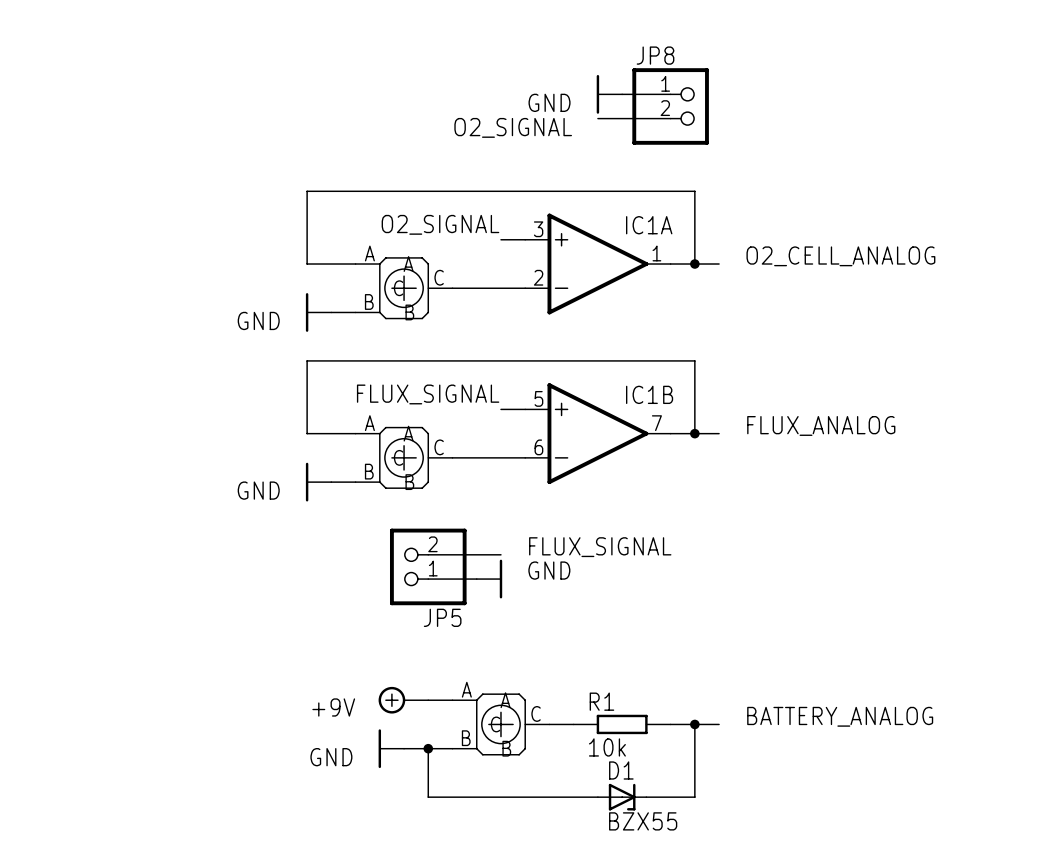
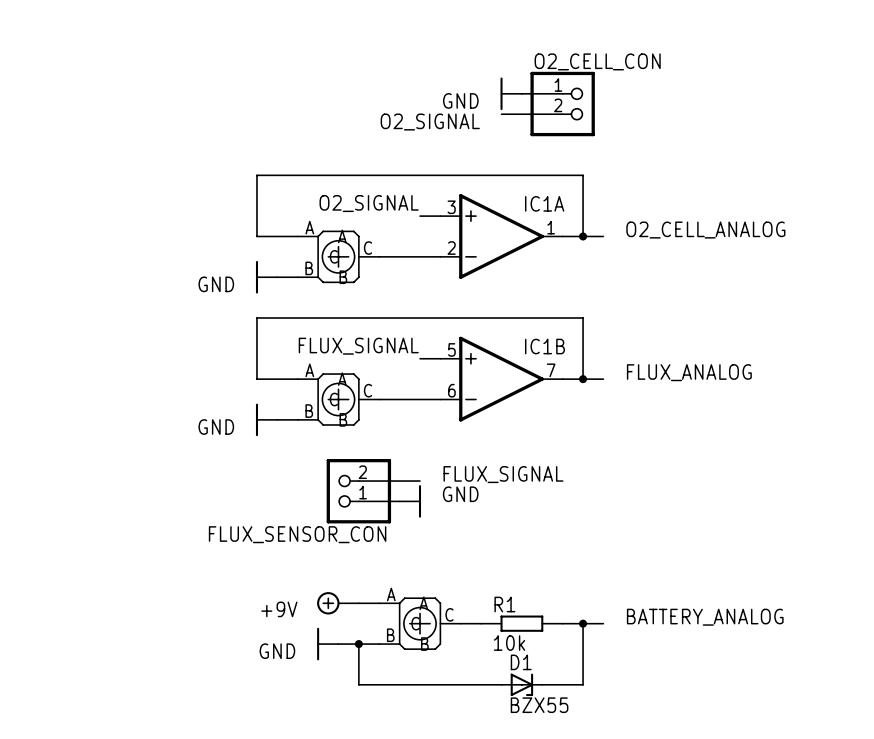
JP8 name: JP8 (655, 55) -> O2_CELL_CON (597, 61)
JP5 name: JP5 (442, 617) -> FLUX_SENSOR_CON (297, 534)

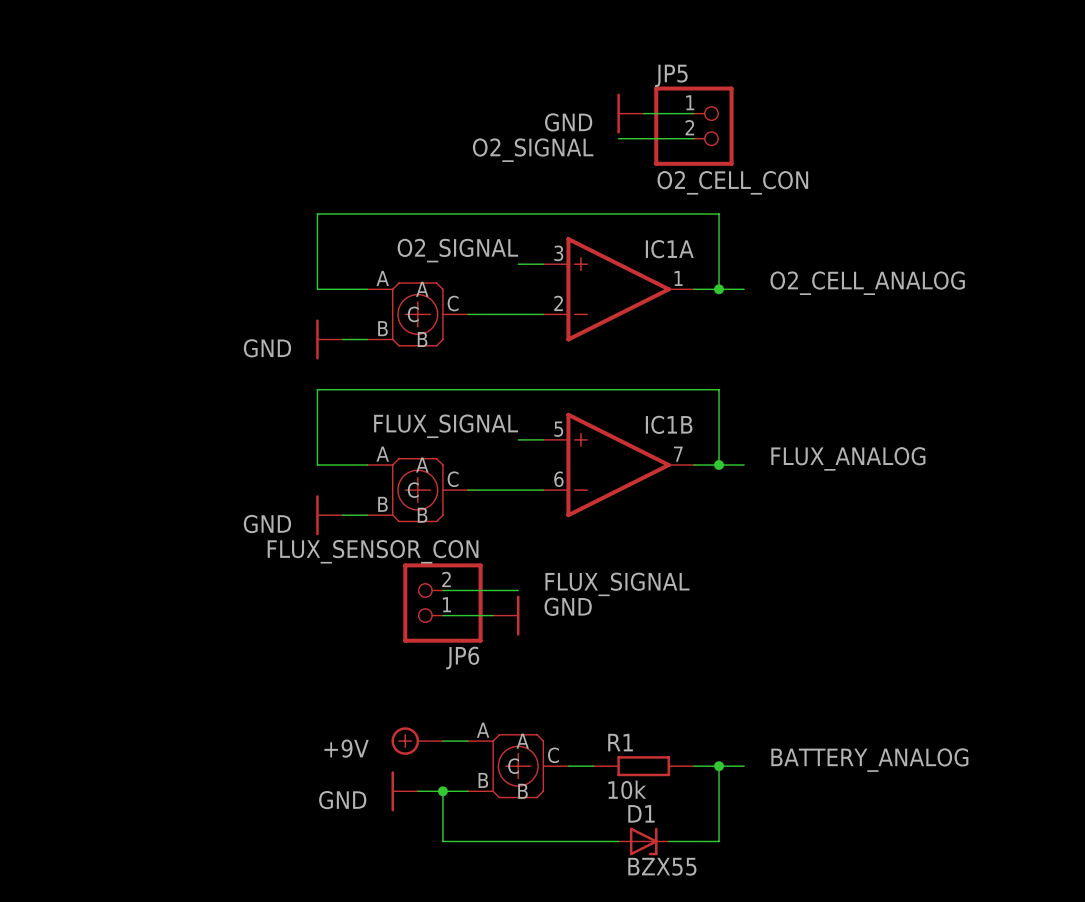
O2_CELL_CON name: O2_CELL_CON (597, 61) -> JP5 (671, 75)
O2_CELL_CON value: none -> O2_CELL_CON (732, 182)
FLUX_SENSOR_CON value: none -> FLUX_SENSOR_CON (373, 551)
FLUX_SENSOR_CON name: FLUX_SENSOR_CON (297, 534) -> JP6 (462, 658)

